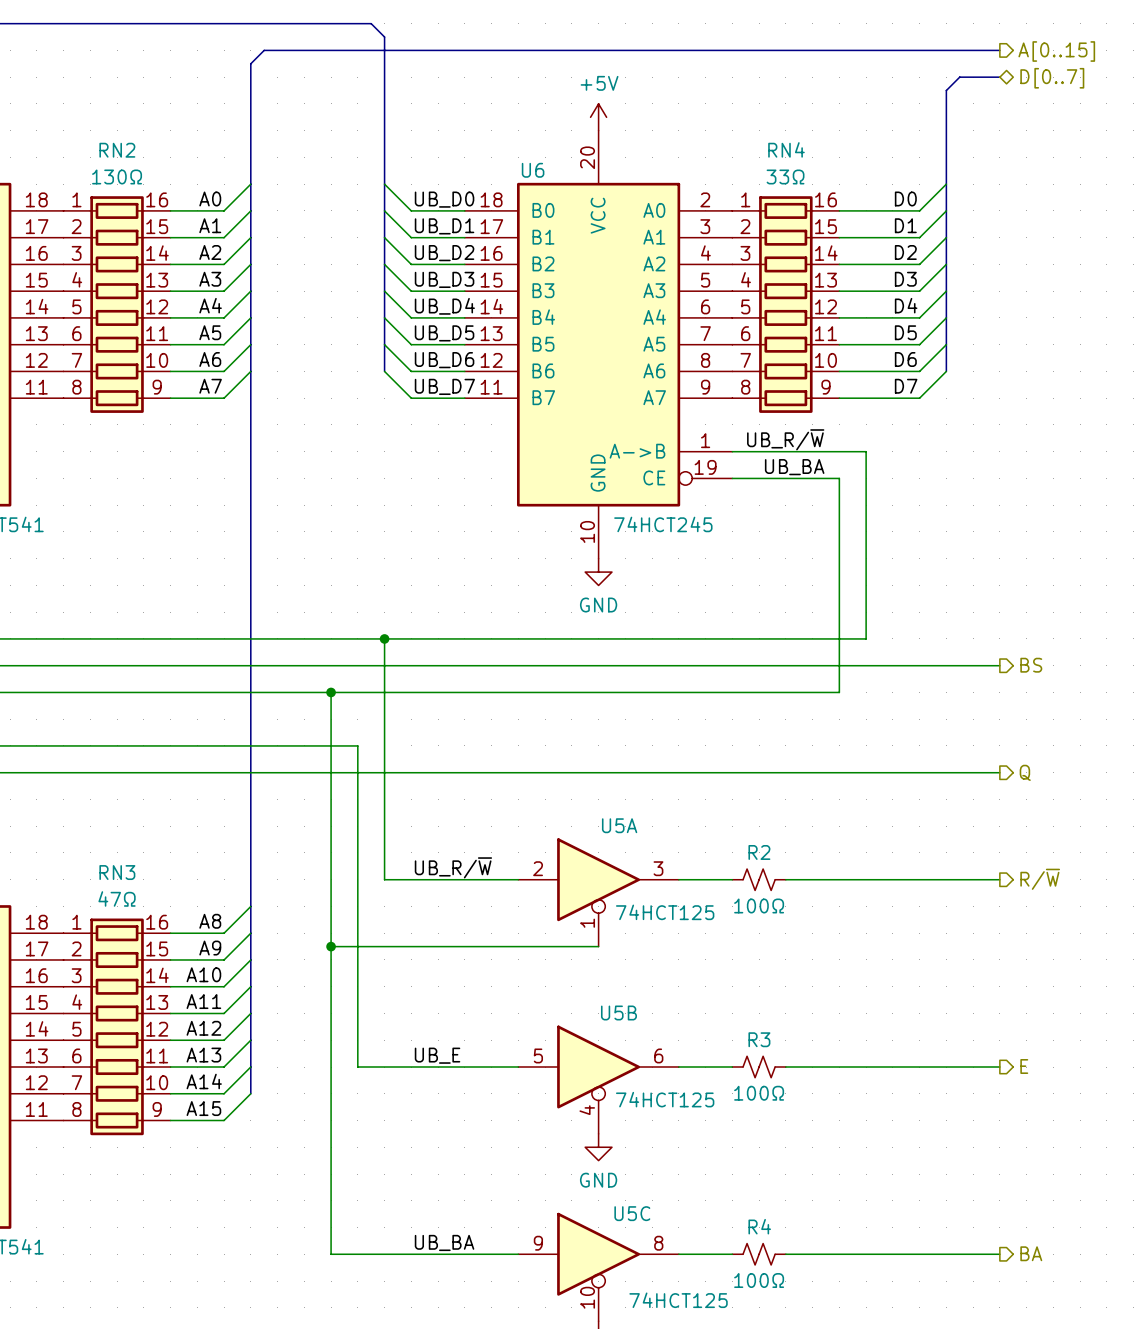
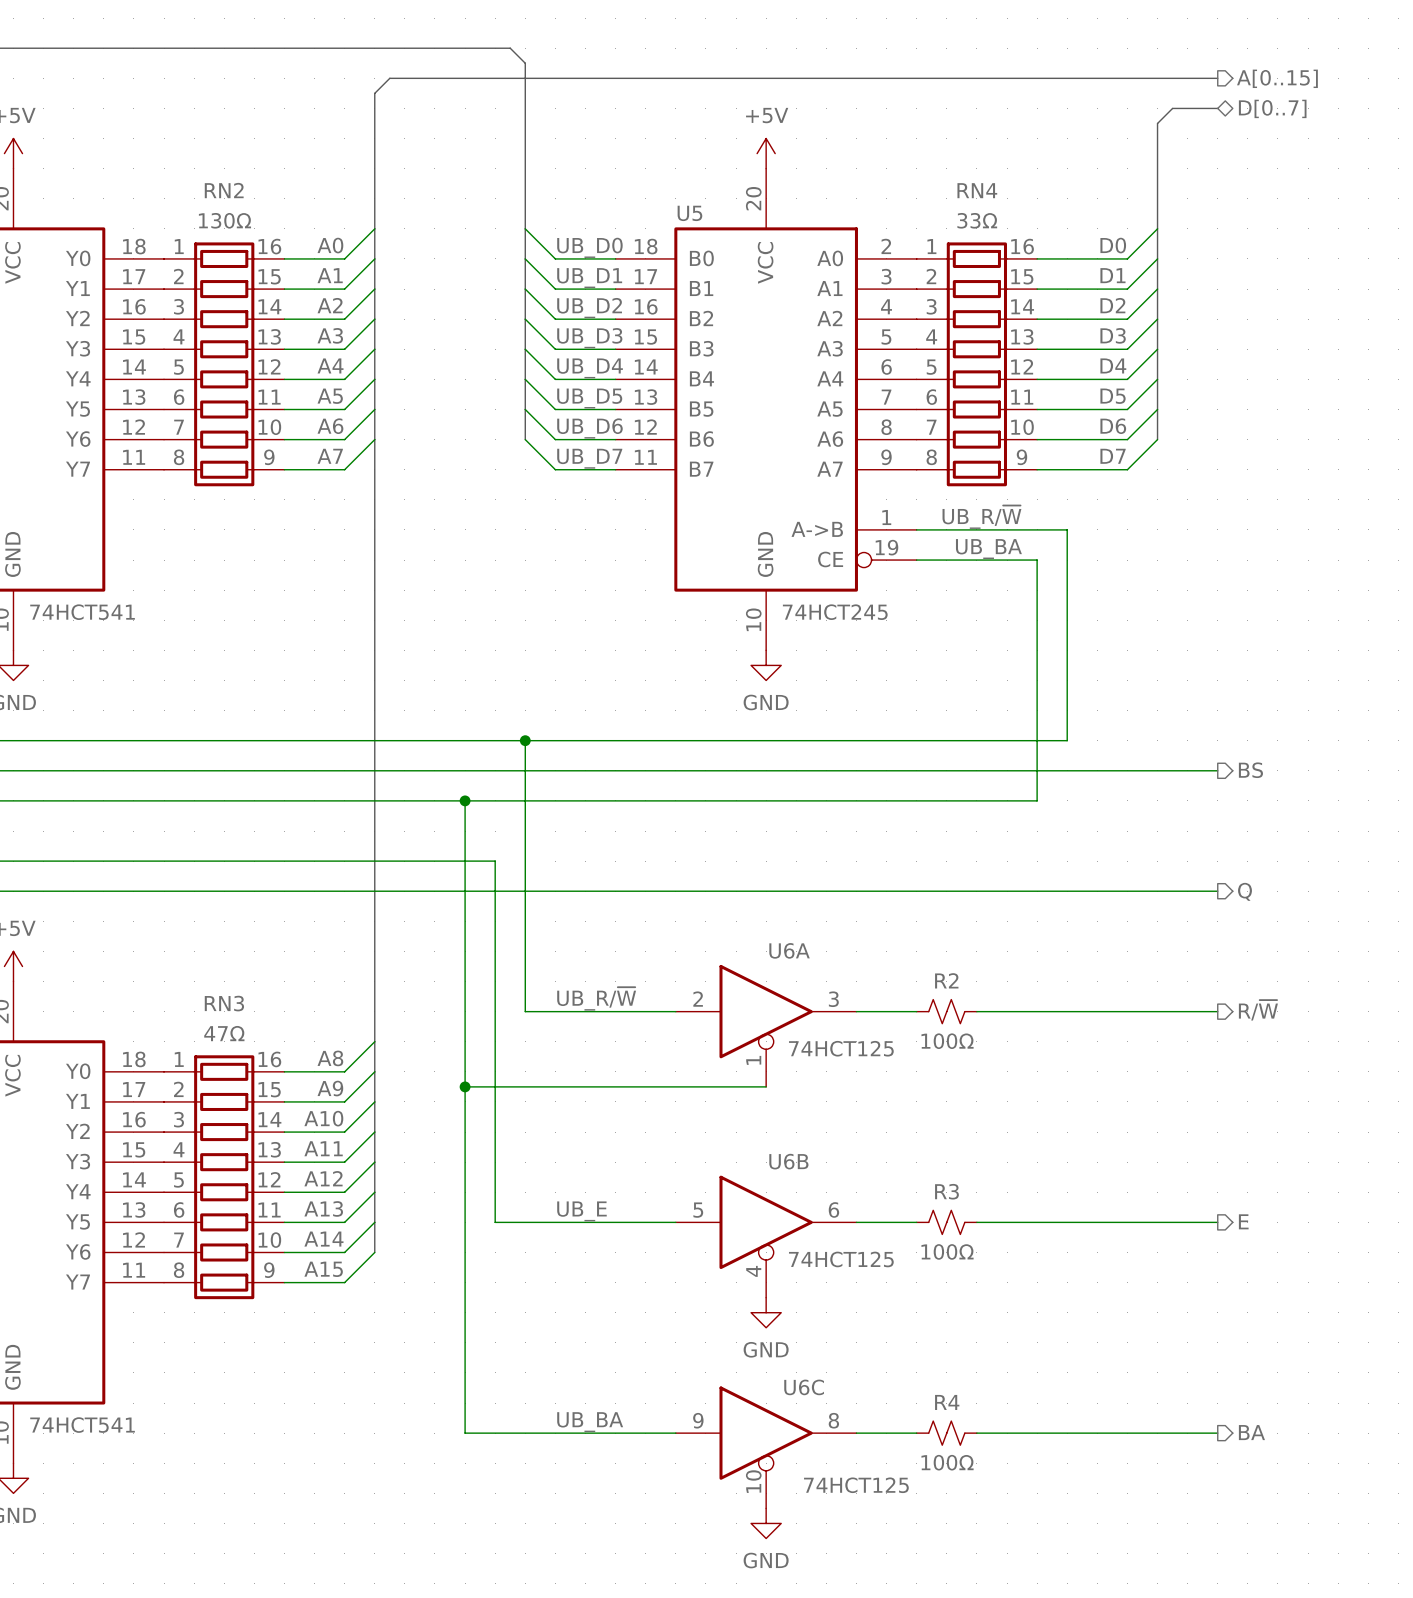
U6 name: U6 (533, 170) -> U5 (689, 213)
U5A name: U5A (619, 825) -> U6A (789, 950)
U5B name: U5B (618, 1012) -> U6B (788, 1161)
U5C name: U5C (632, 1213) -> U6C (804, 1387)

